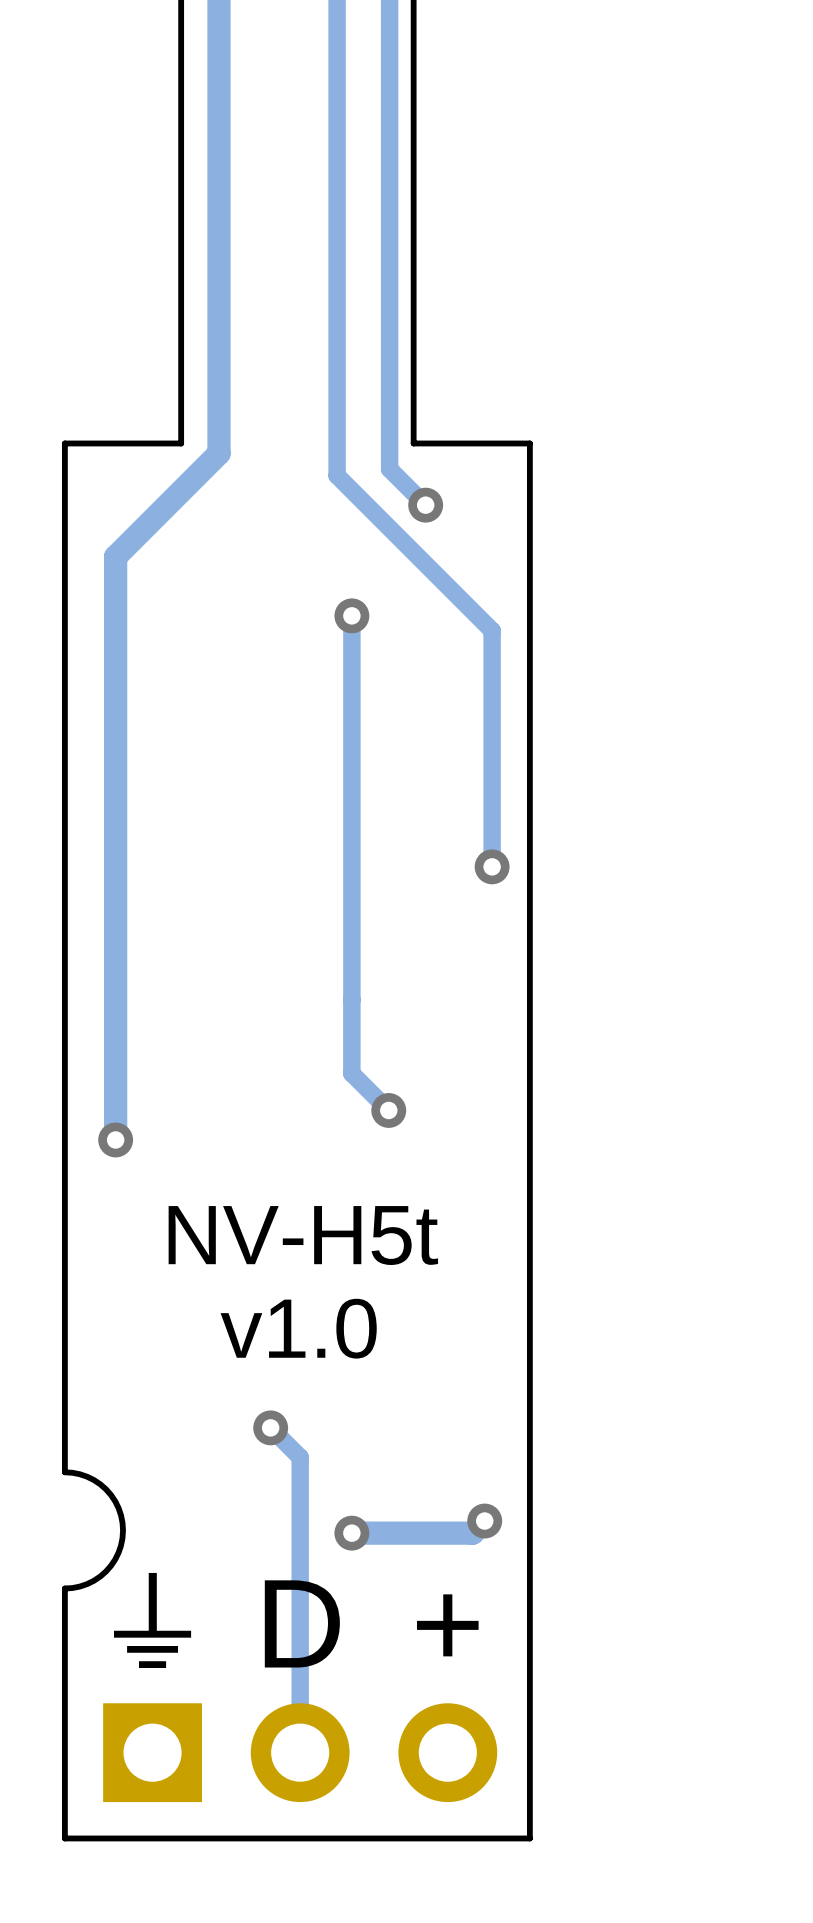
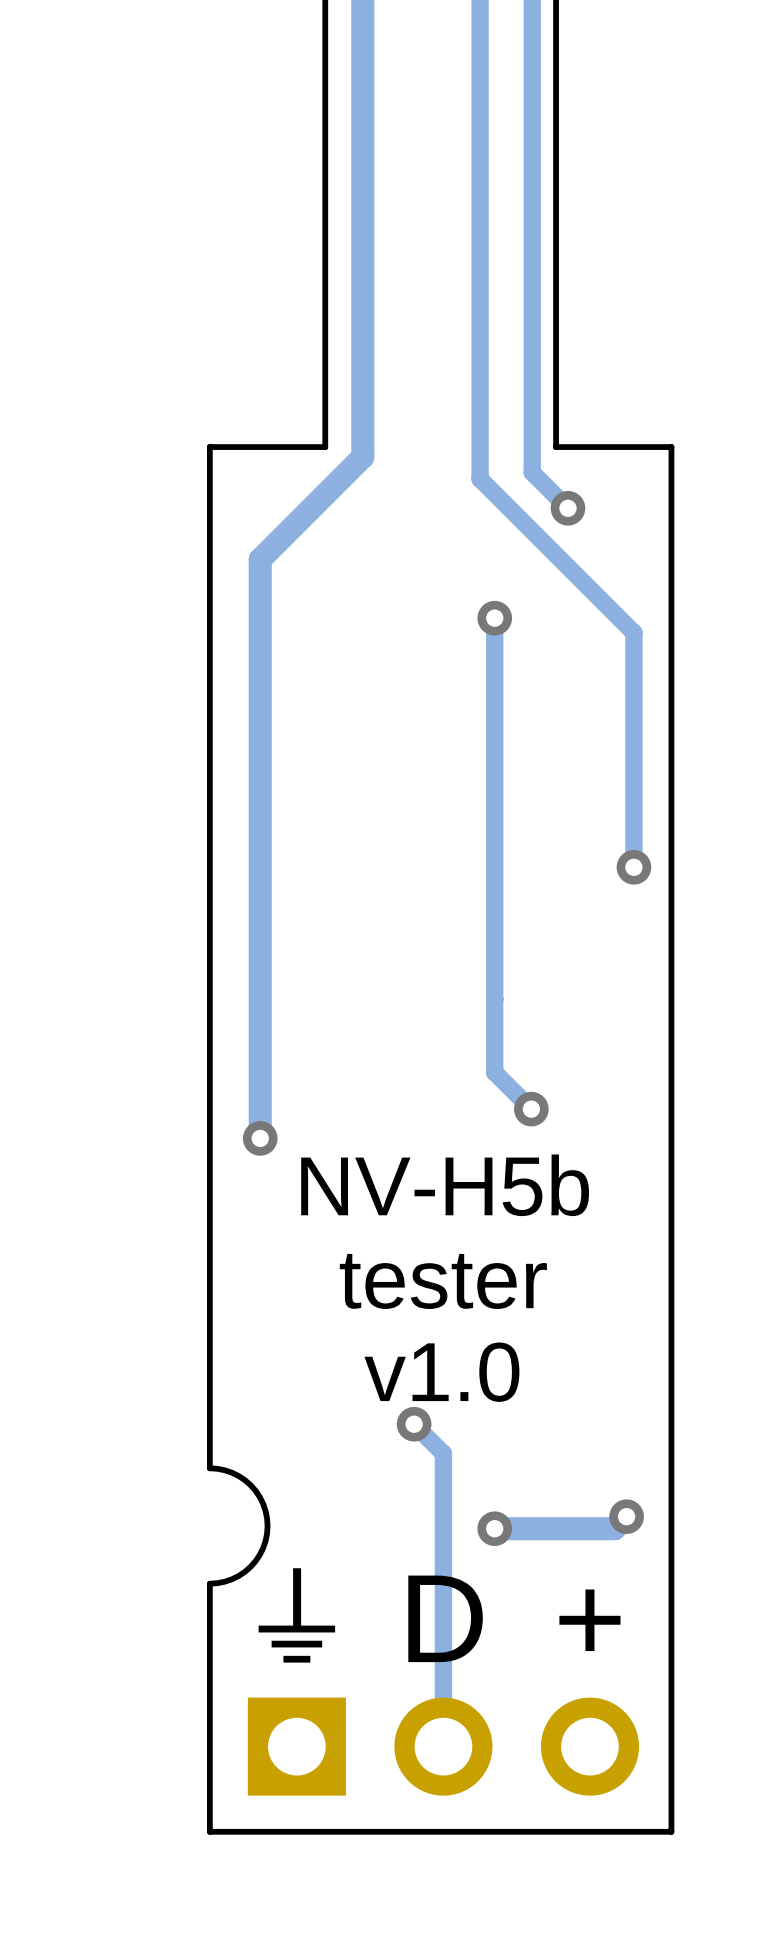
text: NV-H5t (303, 1235) -> NV-H5b (445, 1185)
text: none -> tester (443, 1281)
text position: v1.0 (298, 1328) -> v1.0 (441, 1372)

